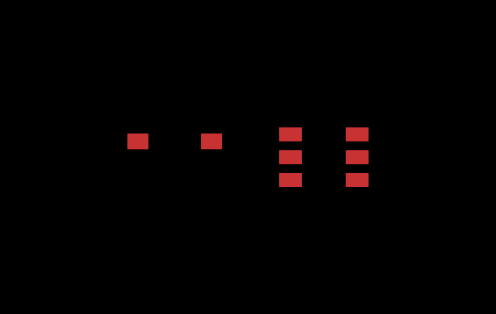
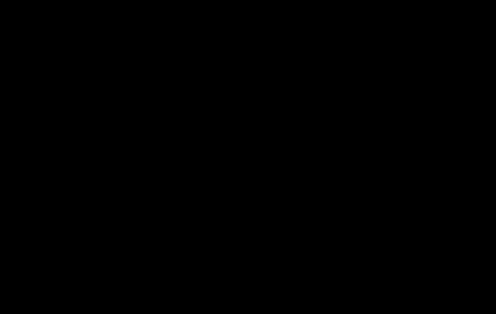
part: (174, 141) -> none
part: (323, 157) -> none

